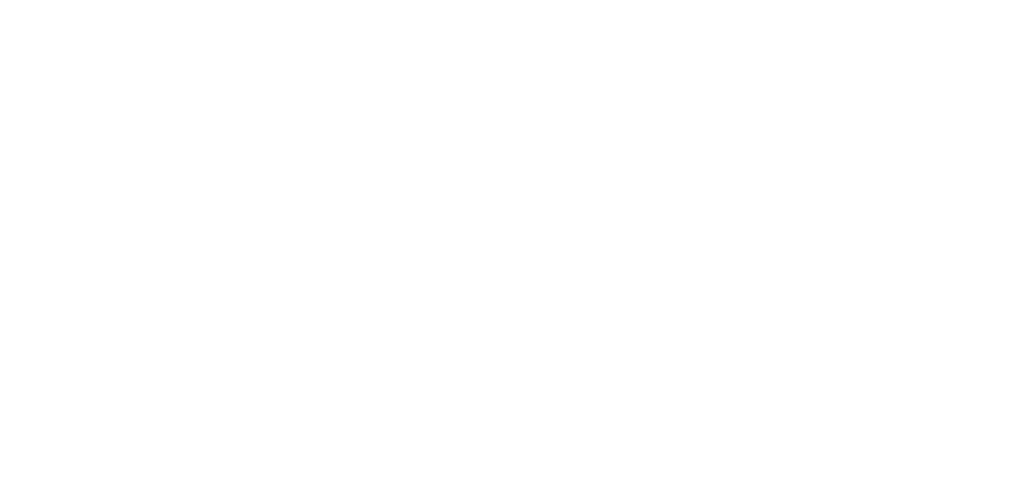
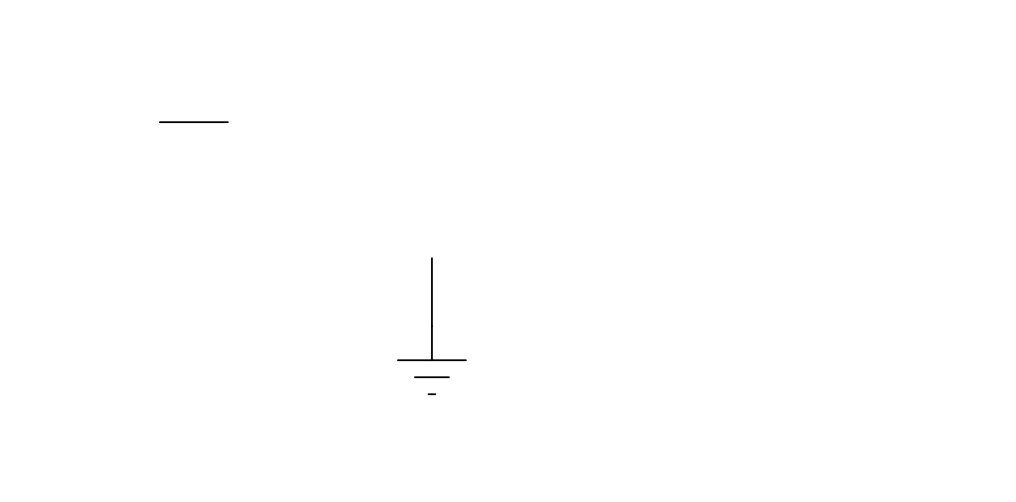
wire: none -> (159, 122) (227, 122)
wire: none -> (431, 258) (431, 326)
power symbol: none -> (431, 360)

